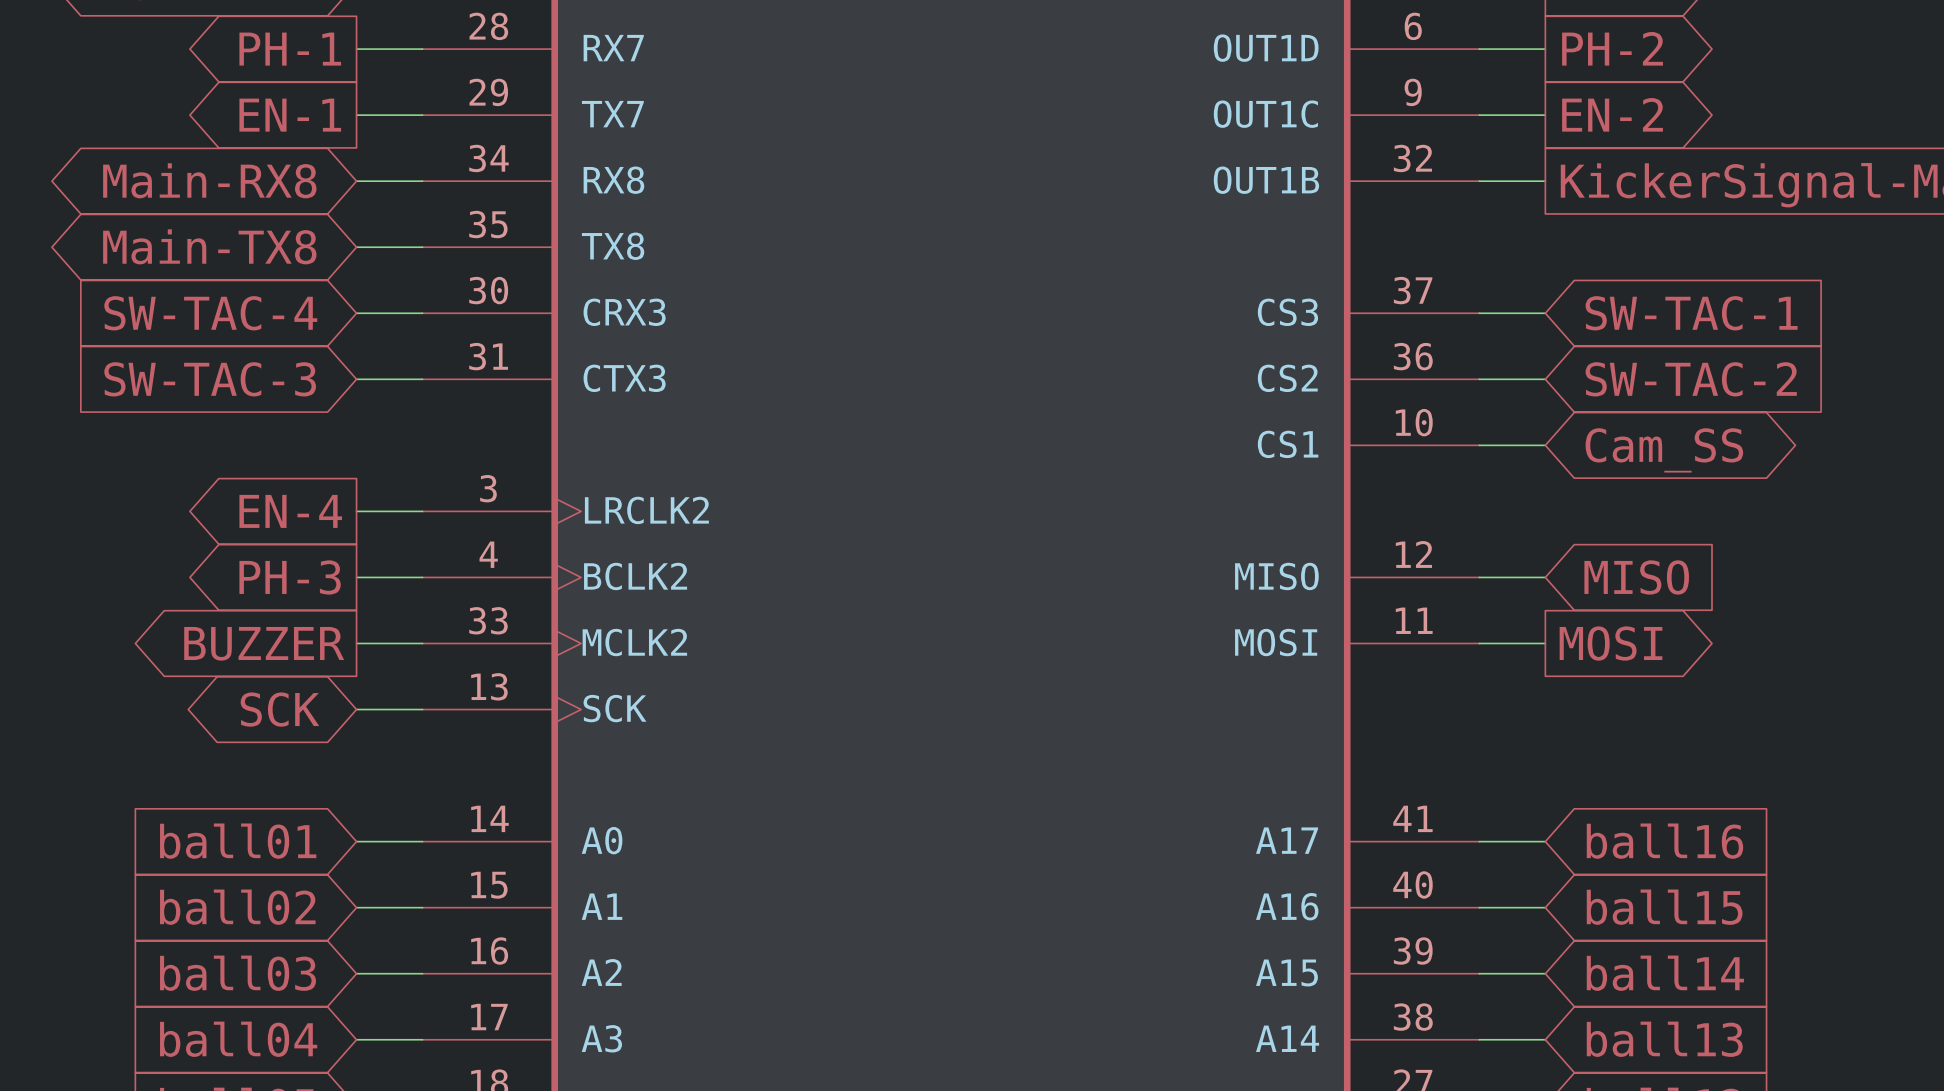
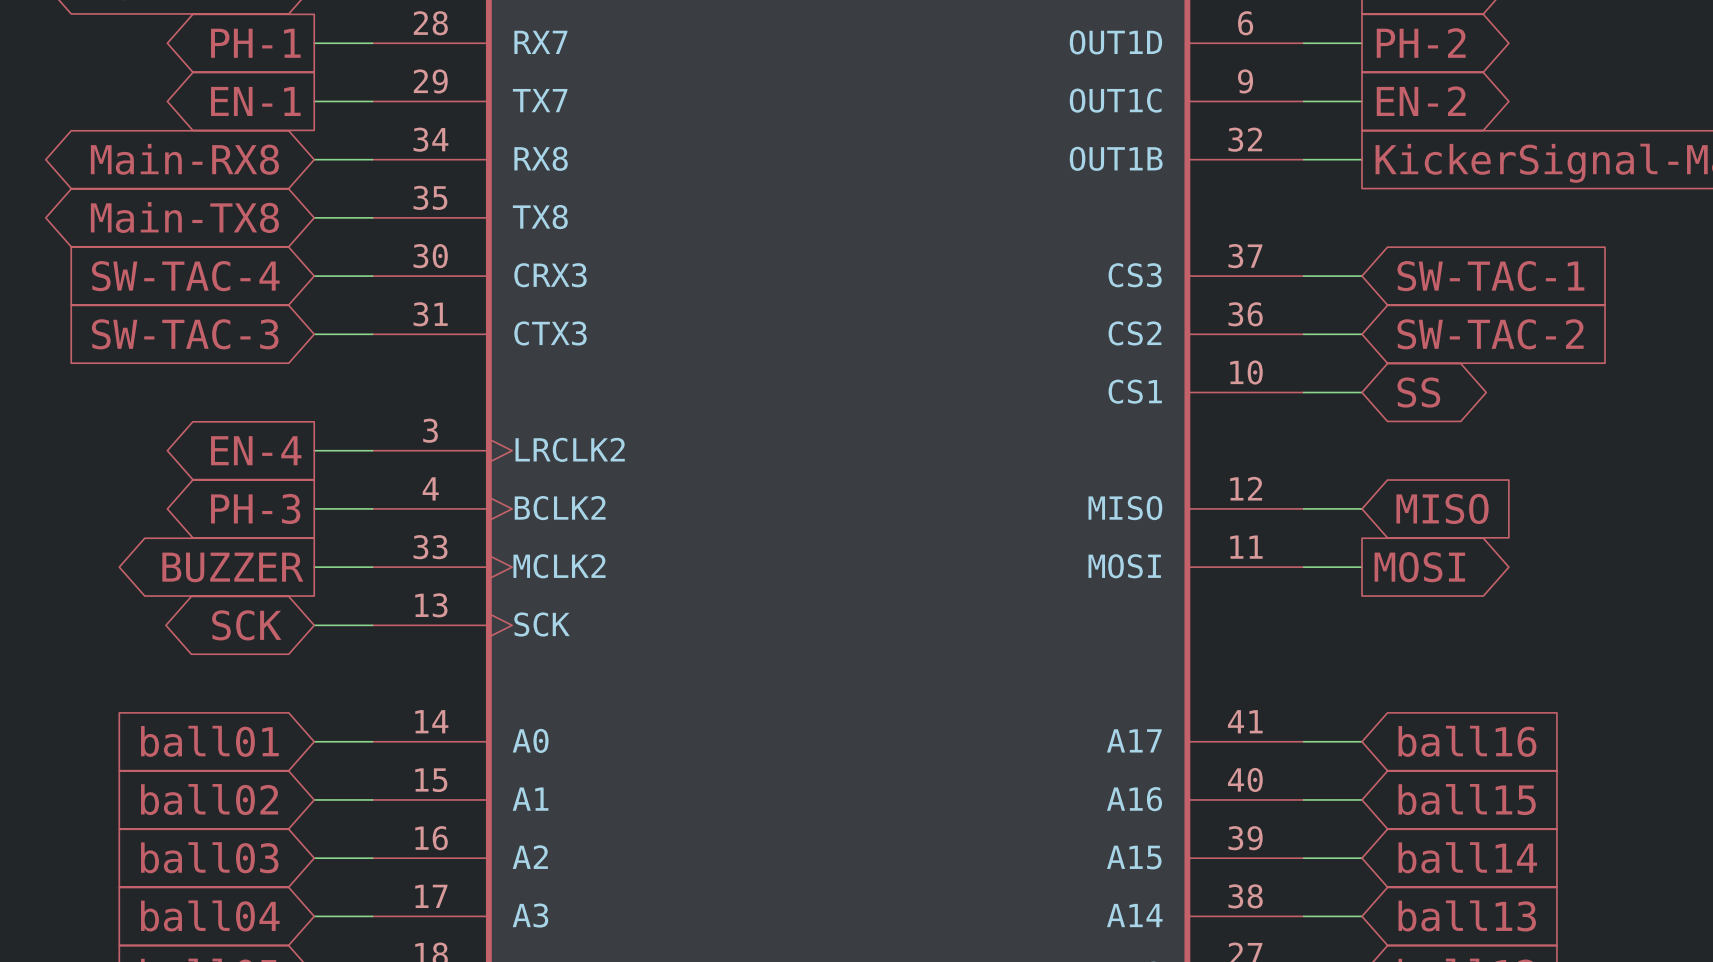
global label: Cam_SS (1664, 450) -> SS (1418, 392)

